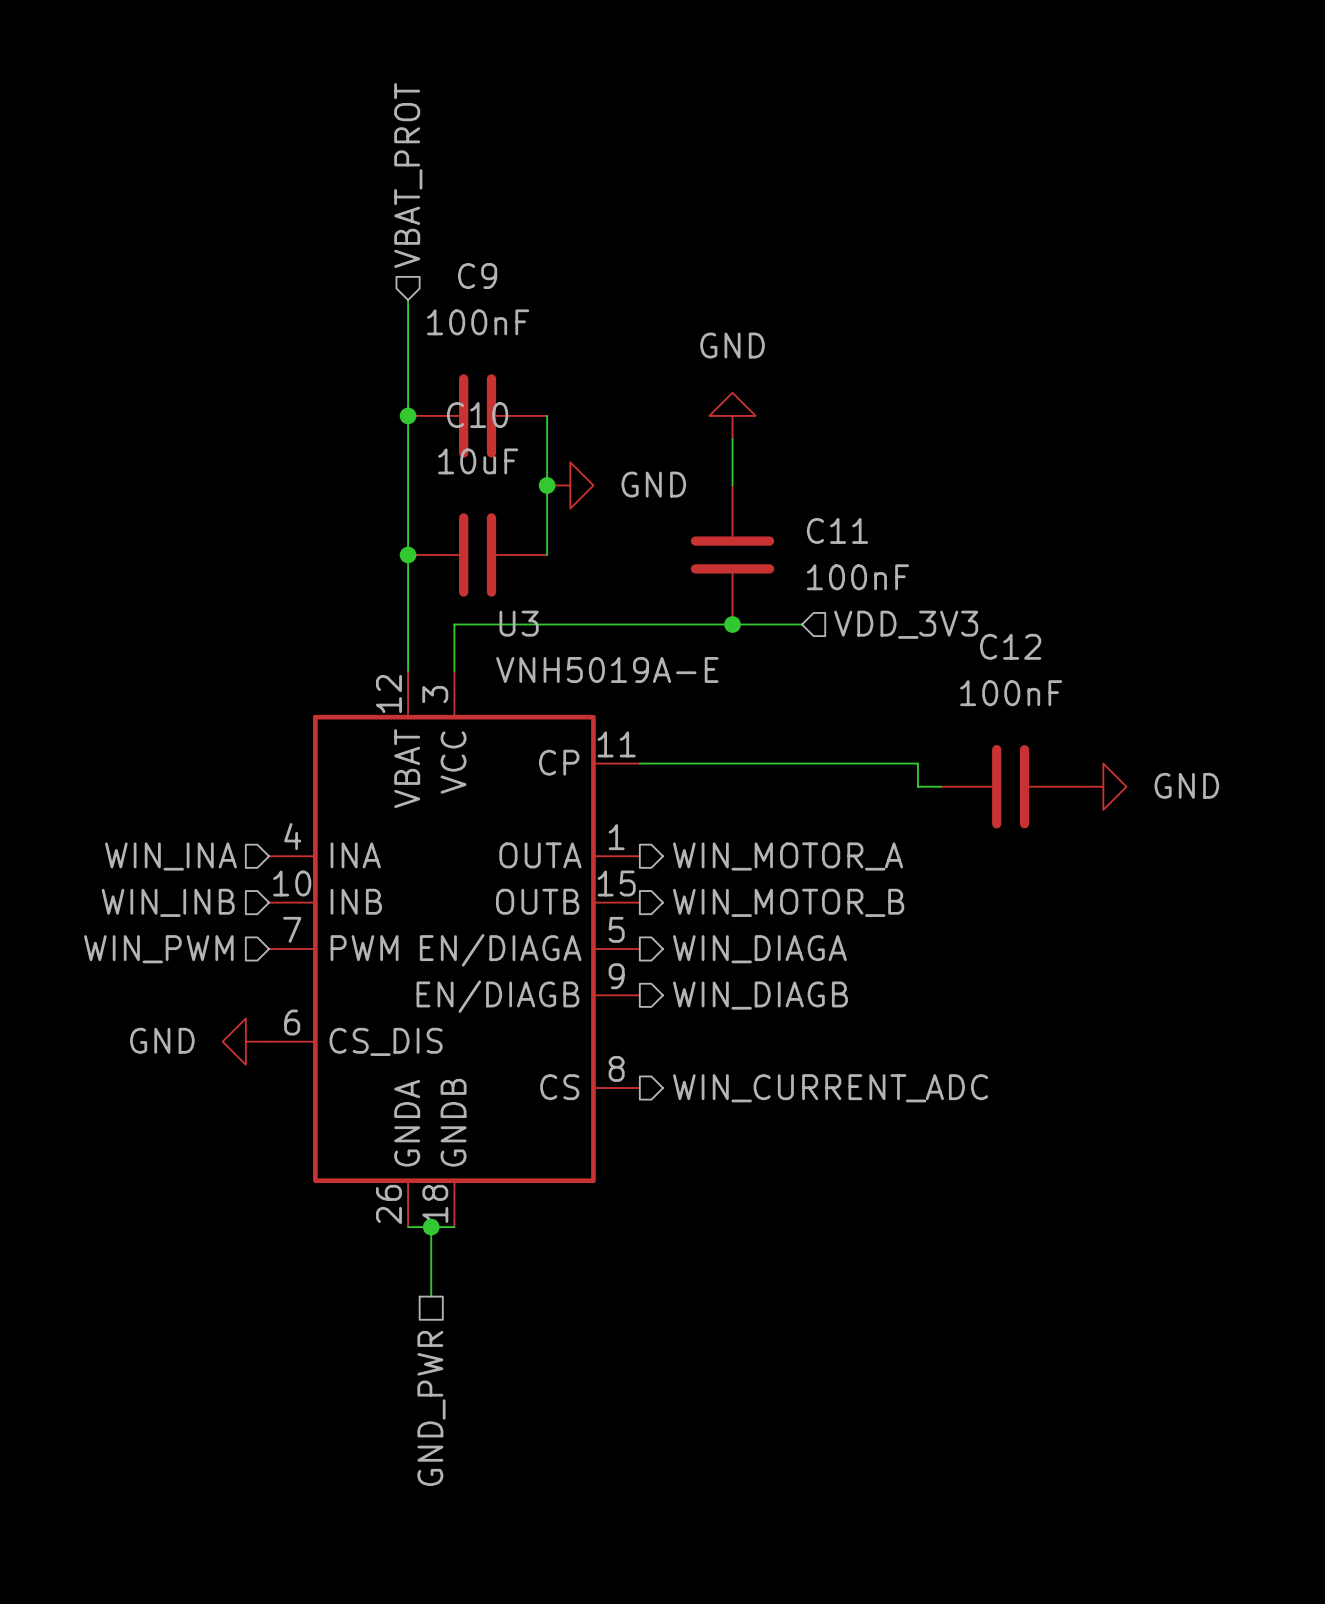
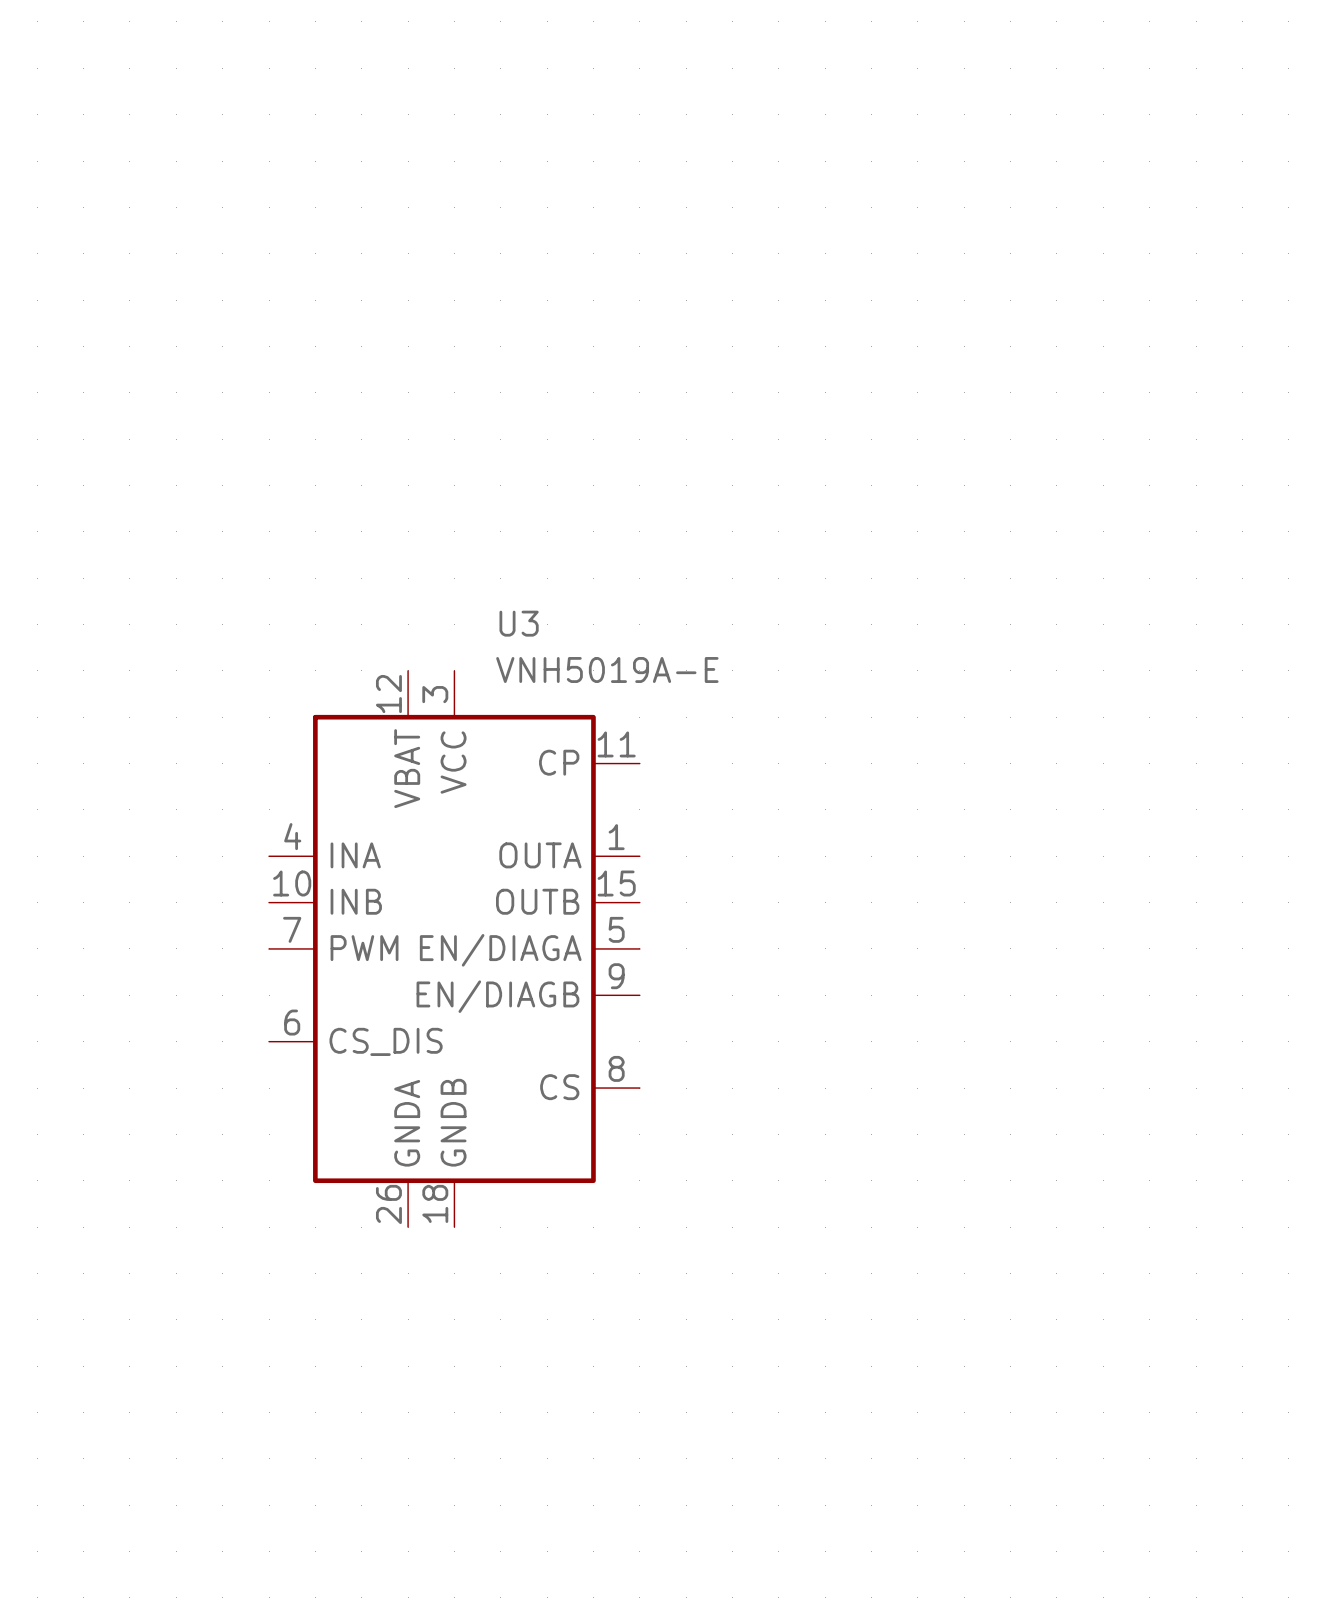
hierarchical label: VBAT_PROT (408, 175) -> none
wire: (408, 300) (408, 670) -> none
junction: (408, 415) -> none
C9: 100nF (477, 415) -> none
wire: (547, 415) (547, 554) -> none
power symbol: GND (732, 415) -> none
wire: (732, 439) (732, 485) -> none
junction: (547, 485) -> none
power symbol: GND (570, 485) -> none
junction: (408, 554) -> none
C10: 10uF (477, 554) -> none
C11: 100nF (732, 554) -> none
junction: (732, 624) -> none
wire: (802, 624) (454, 624) (454, 670) -> none
hierarchical label: VDD_3V3 (906, 624) -> none
wire: (639, 763) (917, 763) (917, 786) (941, 786) -> none
C12: 100nF (1010, 786) -> none
power symbol: GND (1103, 786) -> none
hierarchical label: WIN_INA (170, 856) -> none
hierarchical label: WIN_MOTOR_A (788, 856) -> none
hierarchical label: WIN_INB (168, 902) -> none
hierarchical label: WIN_MOTOR_B (788, 902) -> none
hierarchical label: WIN_PWM (158, 949) -> none
hierarchical label: WIN_DIAGA (759, 949) -> none
hierarchical label: WIN_DIAGB (760, 995) -> none
power symbol: GND (245, 1041) -> none
hierarchical label: WIN_CURRENT_ADC (830, 1088) -> none
wire: (408, 1227) (454, 1227) -> none
wire: (431, 1227) (431, 1296) -> none
junction: (431, 1227) -> none
hierarchical label: GND_PWR (431, 1408) -> none

